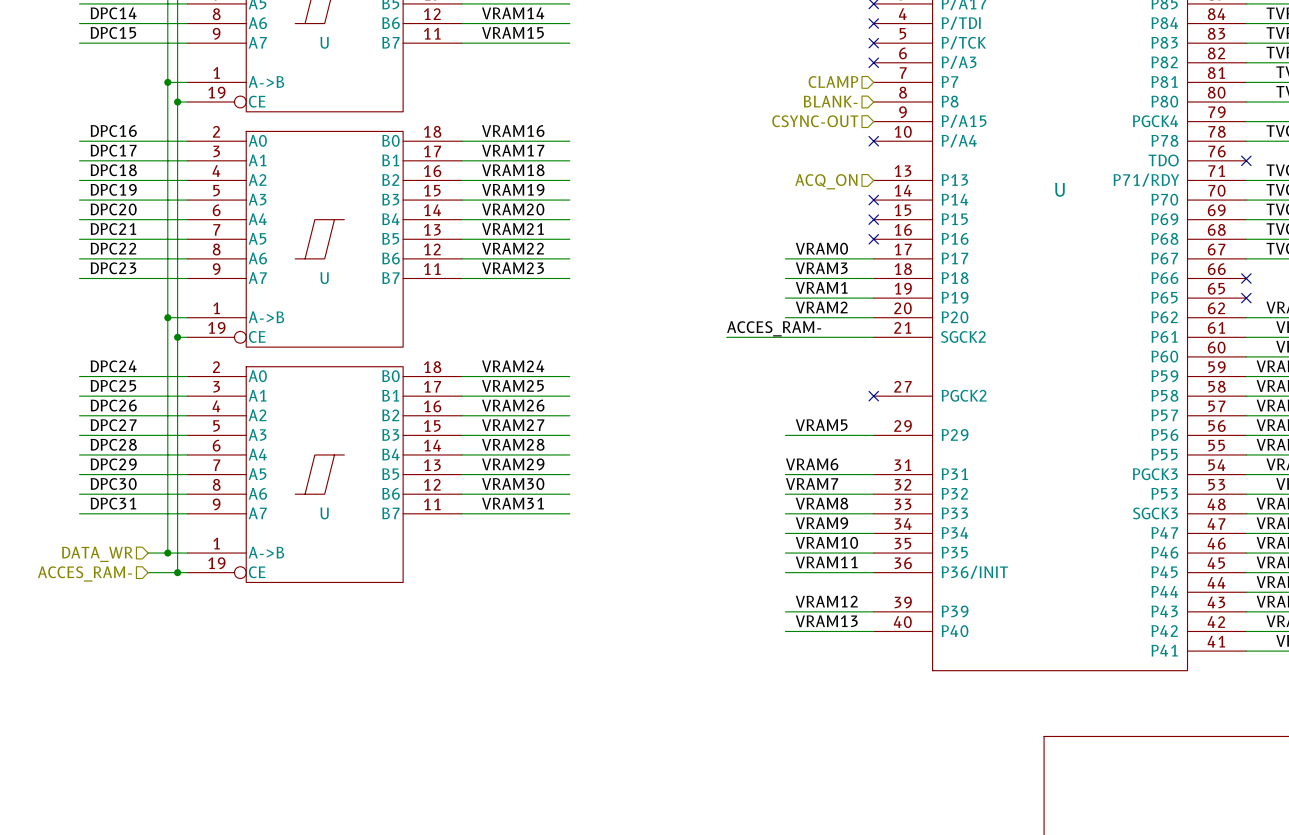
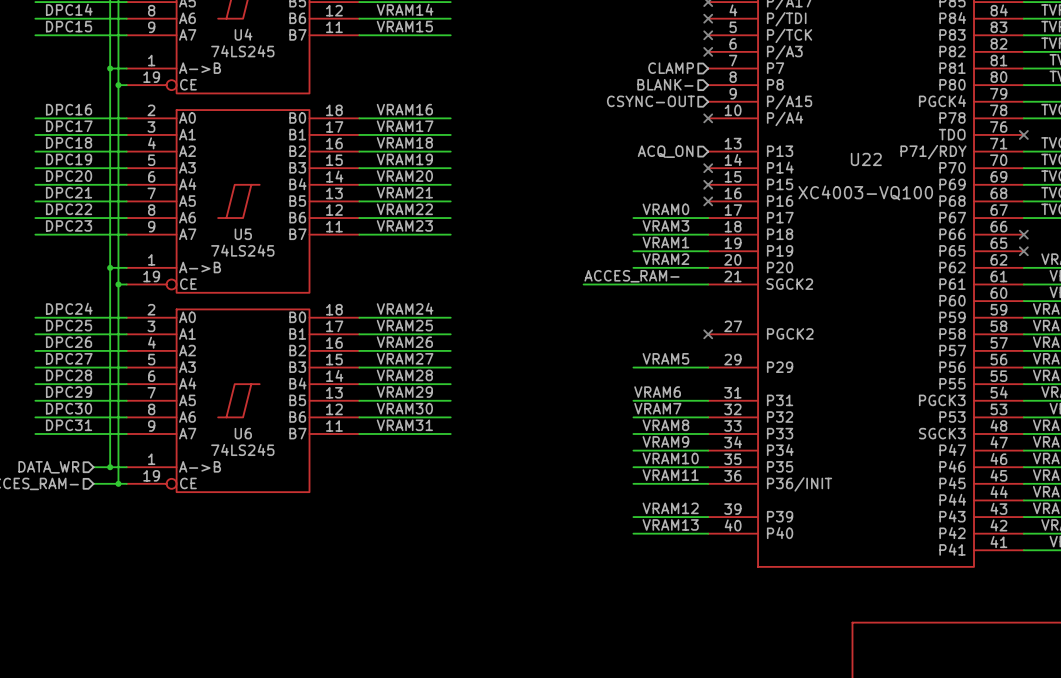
U name: U (324, 42) -> U4 (243, 34)
U value: none -> 74LS245 (242, 51)
U name: U (1059, 189) -> U22 (866, 159)
U value: none -> XC4003-VQ100 (865, 192)
U name: U (324, 278) -> U5 (243, 234)
U value: none -> 74LS245 (242, 250)
U name: U (324, 513) -> U6 (243, 433)
U value: none -> 74LS245 (242, 450)

